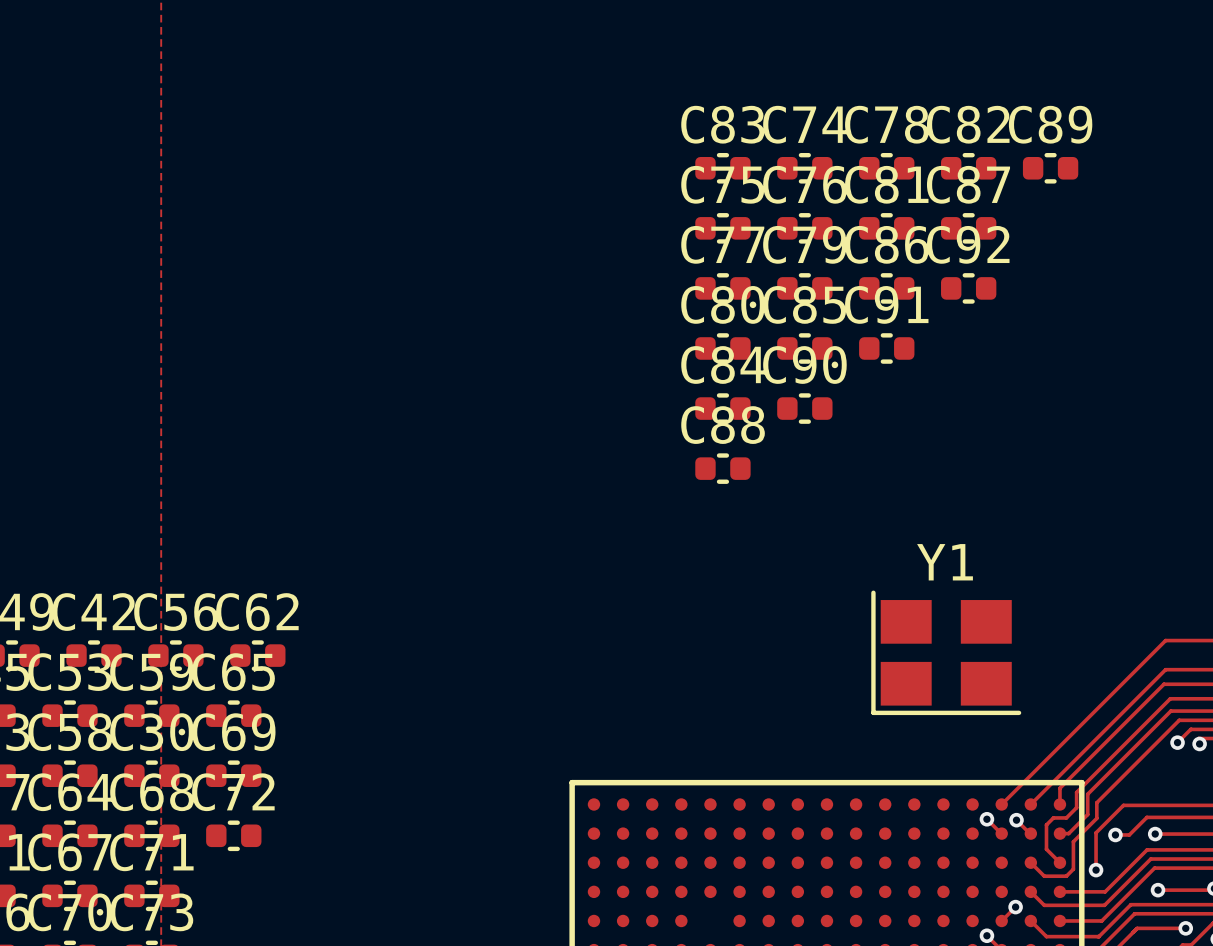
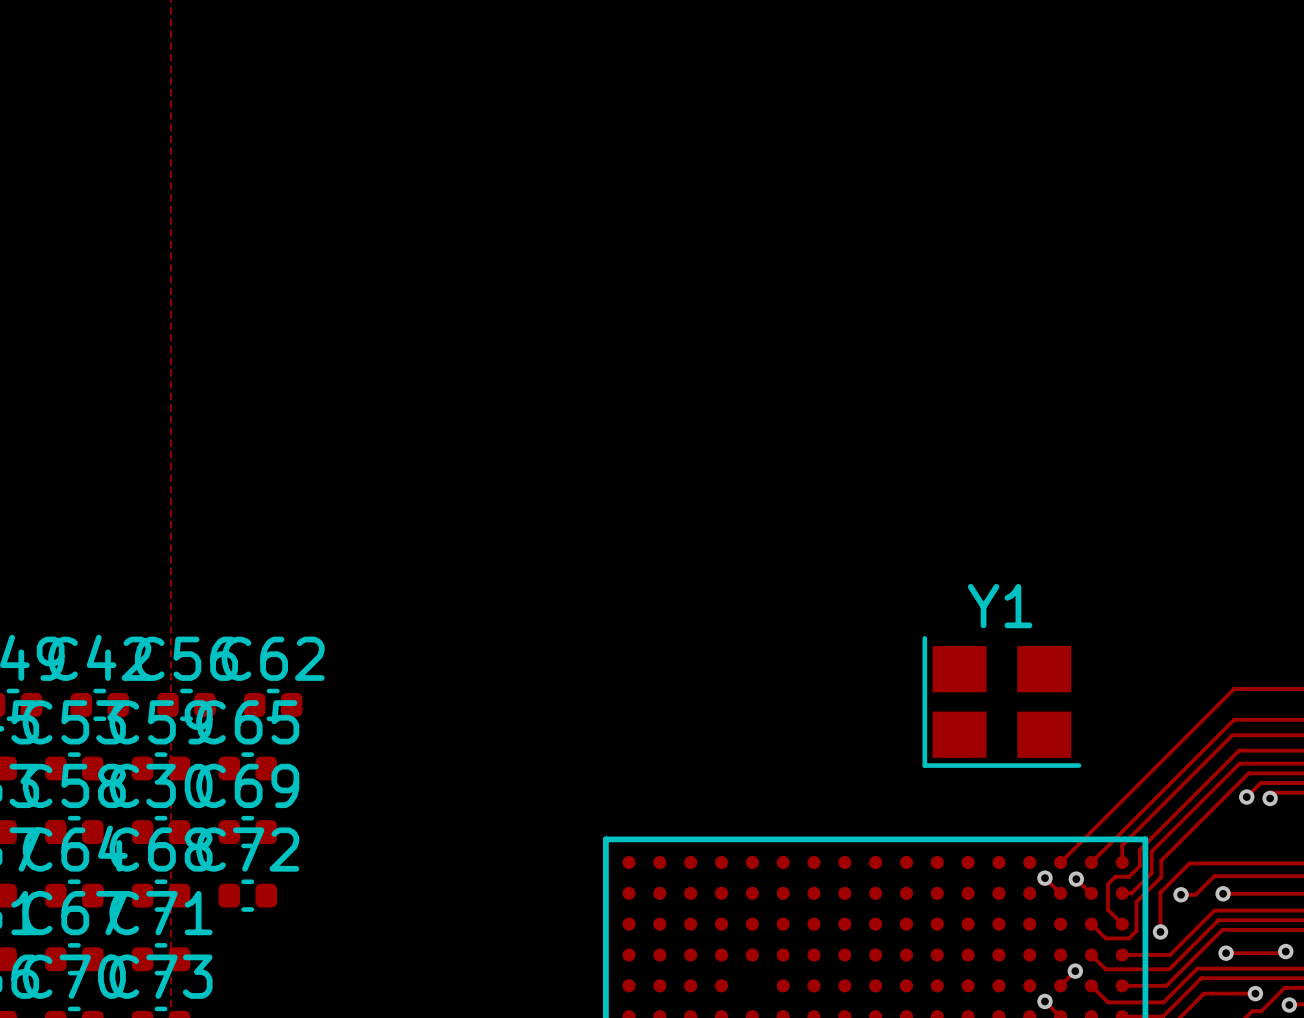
C83: (722, 168) -> none
C74: (804, 168) -> none
C78: (886, 168) -> none
C82: (968, 168) -> none
C89: (1050, 168) -> none
C75: (722, 228) -> none
C76: (804, 228) -> none
C81: (886, 228) -> none
C87: (968, 228) -> none
C77: (722, 288) -> none
C79: (804, 288) -> none
C86: (886, 288) -> none
C92: (968, 288) -> none
C80: (722, 348) -> none
C85: (804, 348) -> none
C91: (886, 348) -> none
C84: (722, 408) -> none
C90: (804, 408) -> none
C88: (722, 468) -> none

